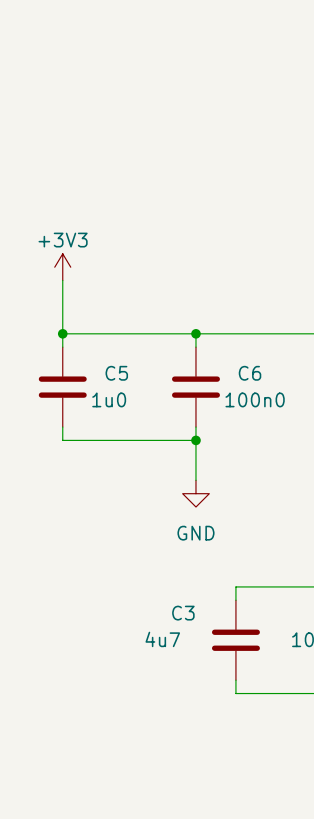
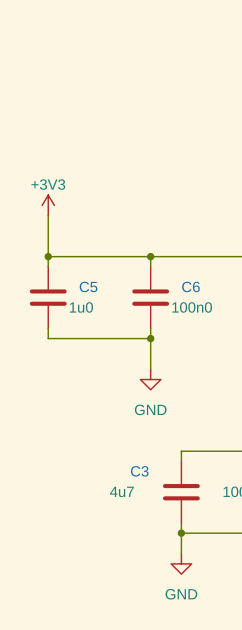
wire: none -> (181, 533) (181, 553)
junction: none -> (181, 533)
power symbol: none -> GND (181, 563)

